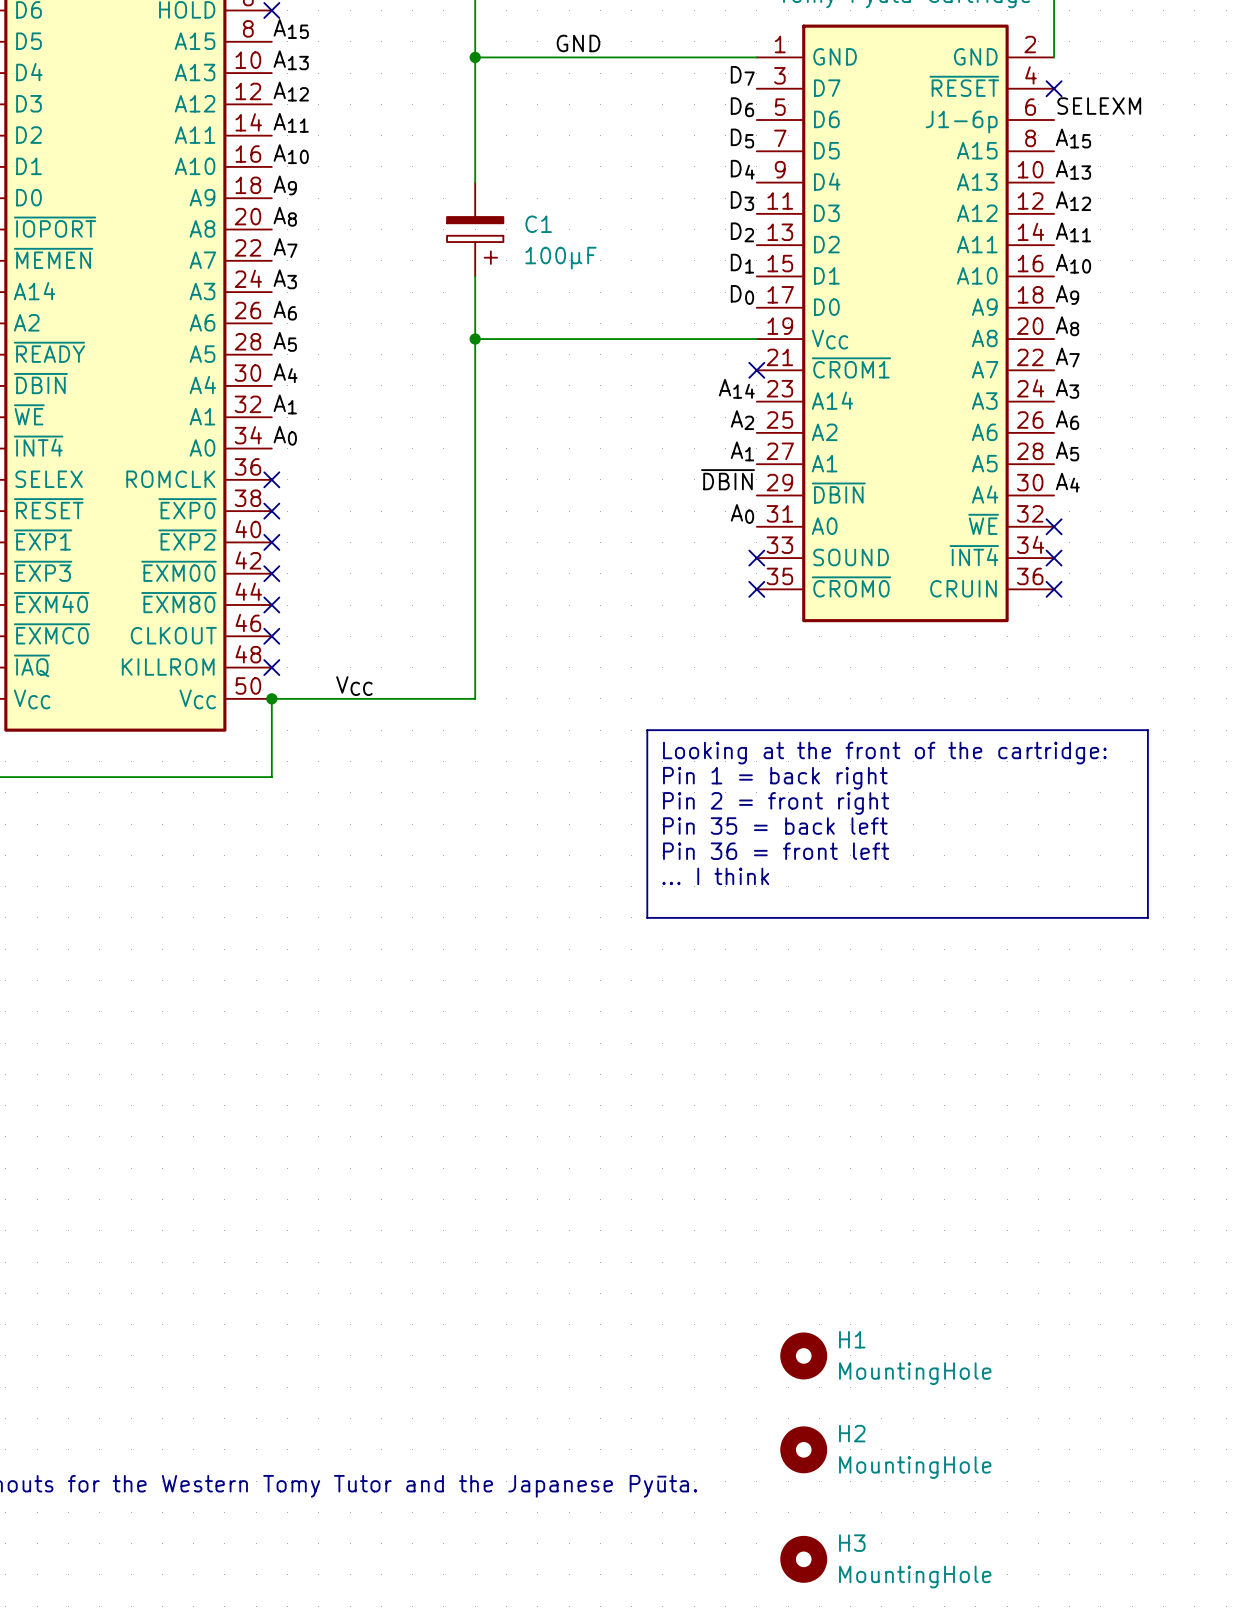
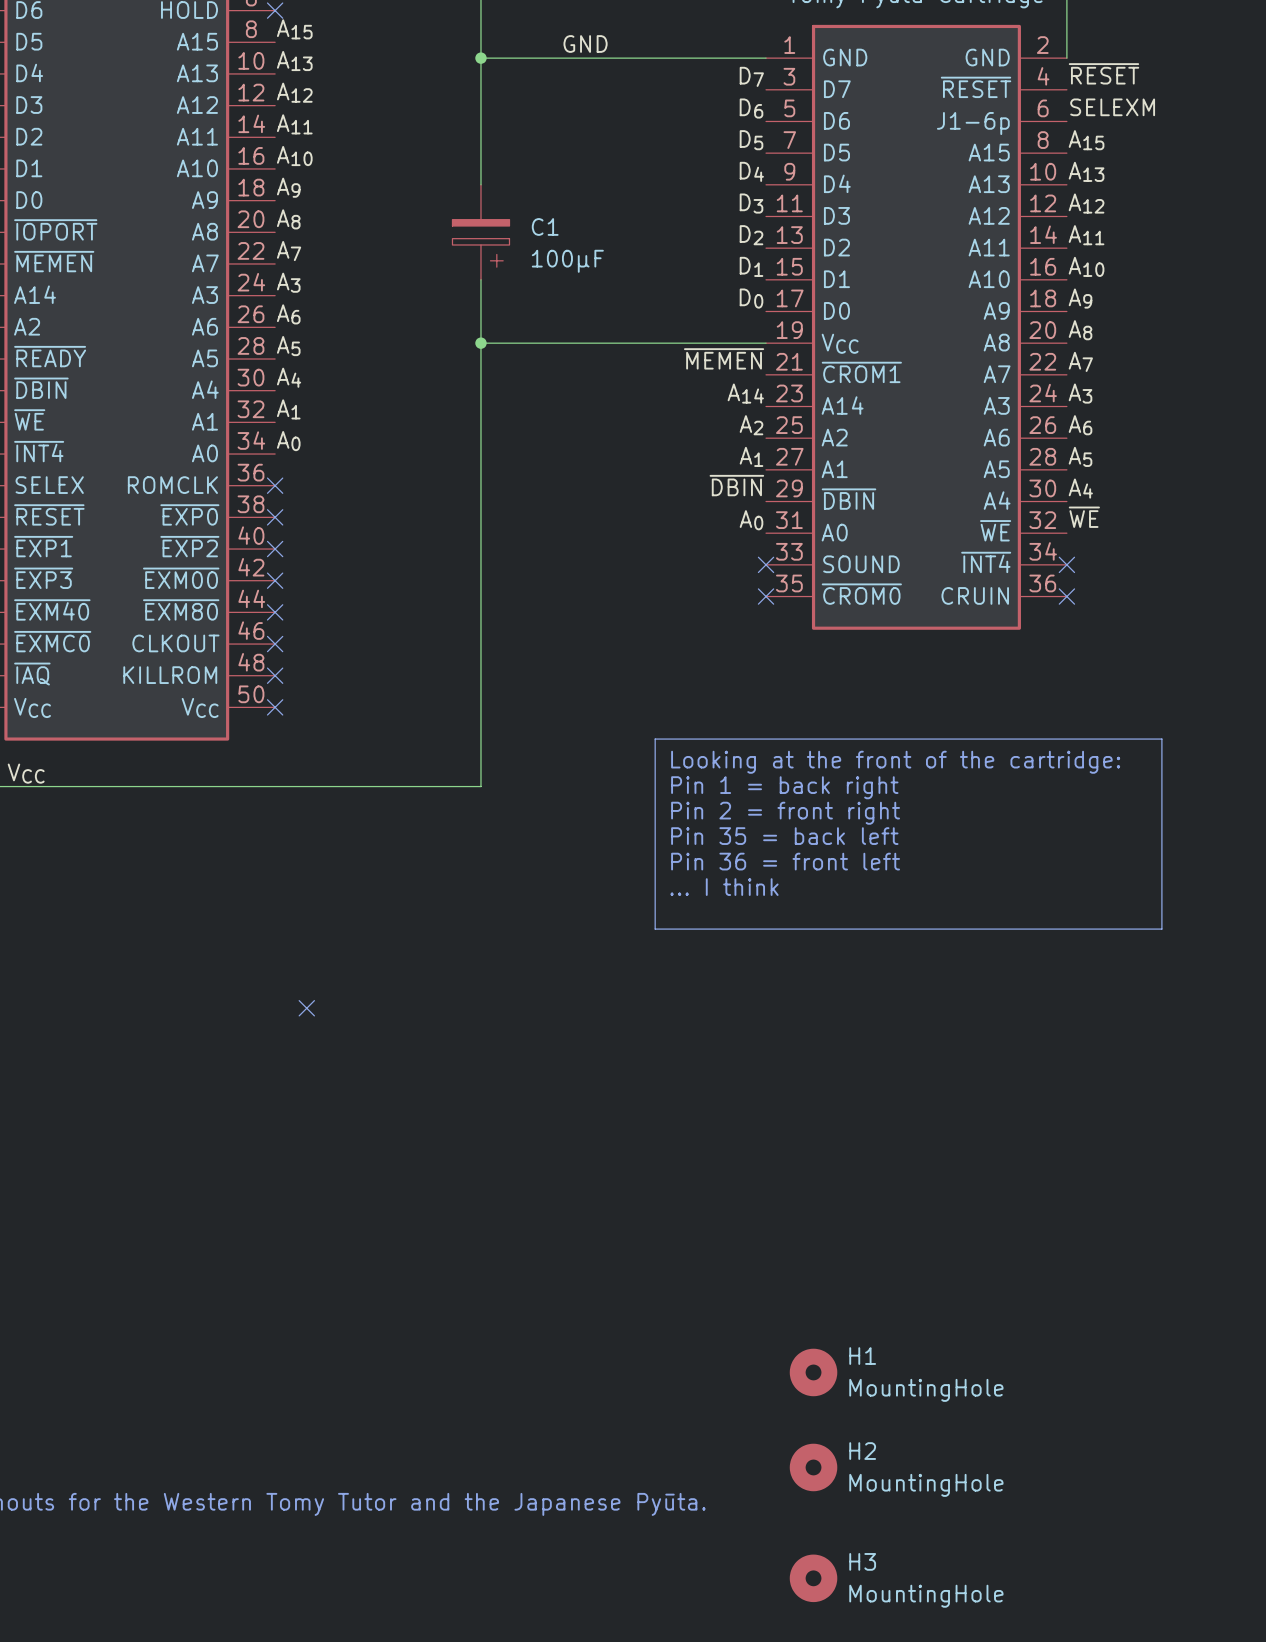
label: none -> ~{RESET} (1104, 73)
no-connect mark: (1054, 88) -> none
label: none -> ~{MEMEN} (724, 358)
no-connect mark: (756, 370) -> none
label: none -> ~{WE} (1084, 517)
no-connect mark: (1054, 526) -> none
label: VCC (354, 686) -> none
junction: (271, 698) -> none
no-connect mark: none -> (275, 707)
wire: (475, 698) (271, 698) (271, 777) -> (480, 707) (480, 786) (275, 786)
label: none -> VCC (26, 773)
no-connect mark: none -> (306, 1008)

